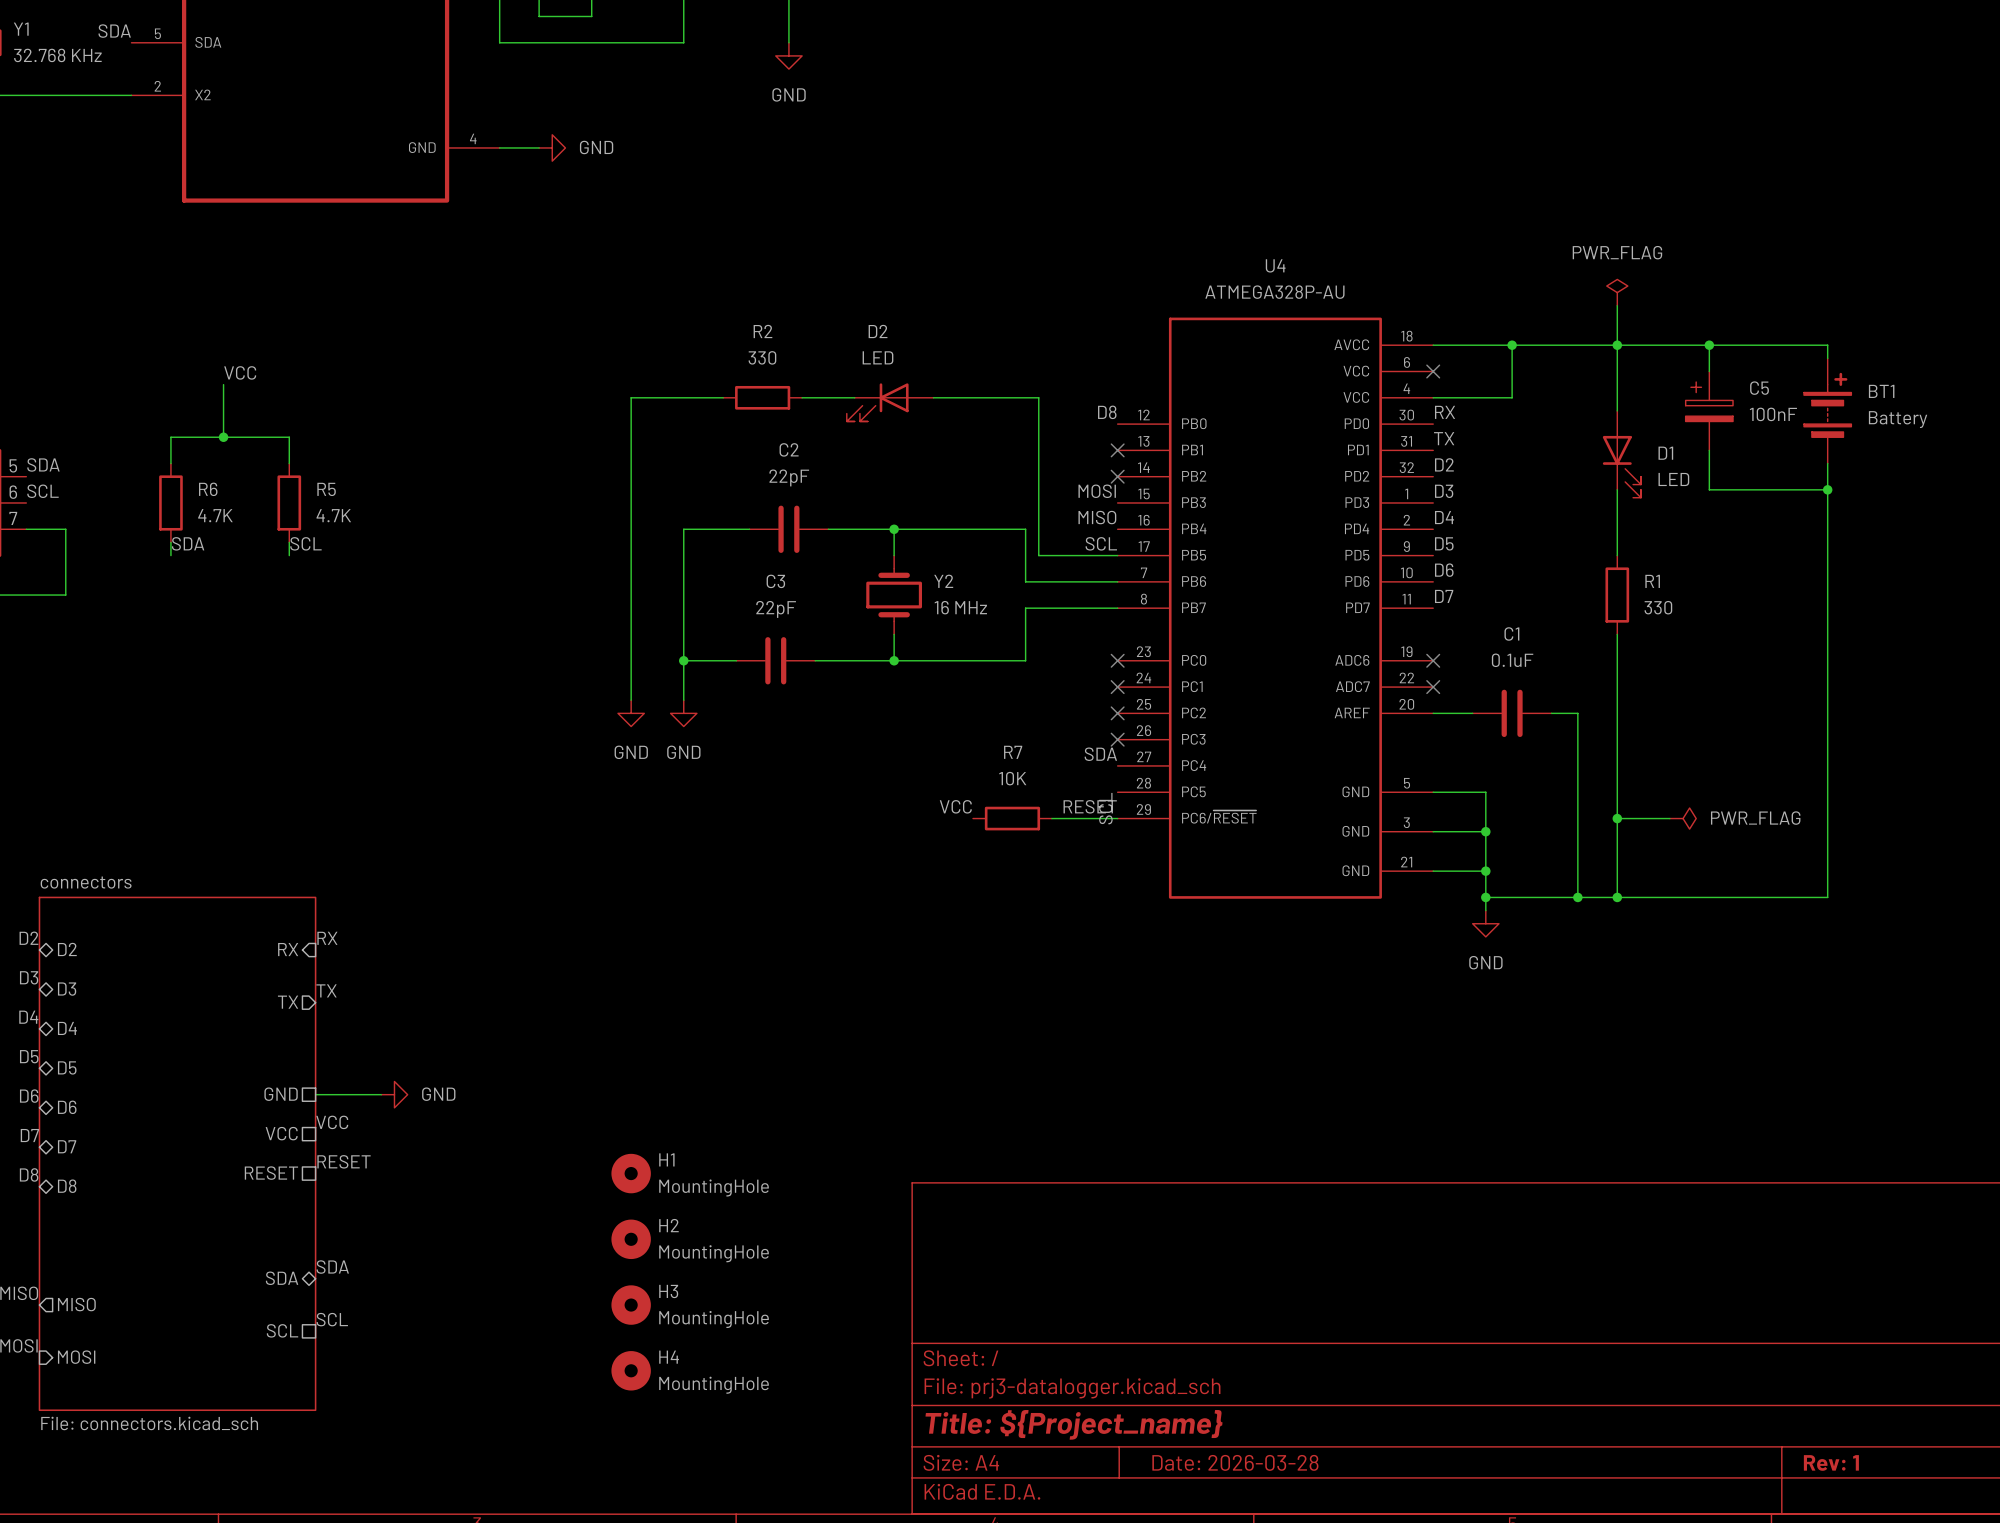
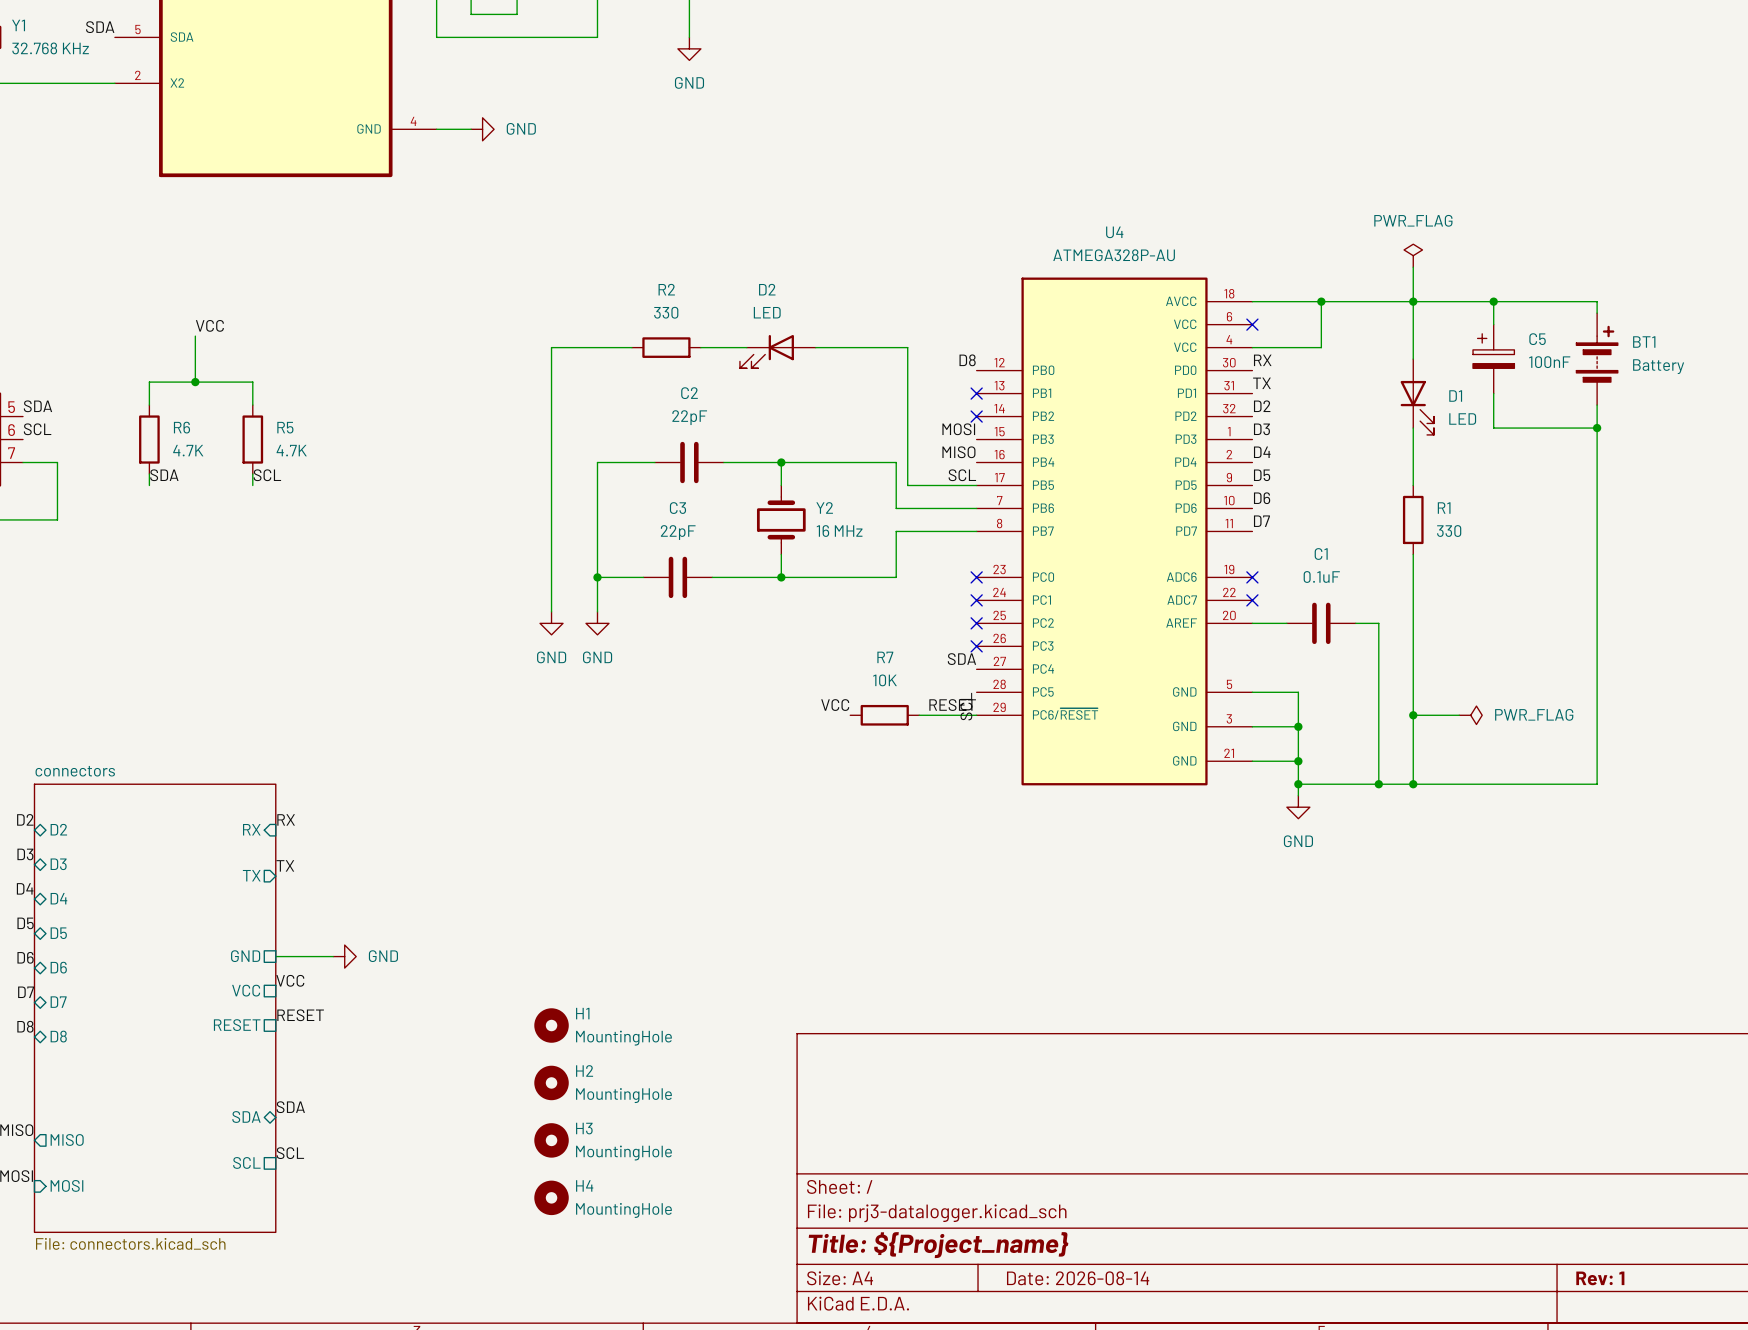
title block: Date: 2026-03-28 (1235, 1462) -> Date: 2026-08-14 (1078, 1278)

